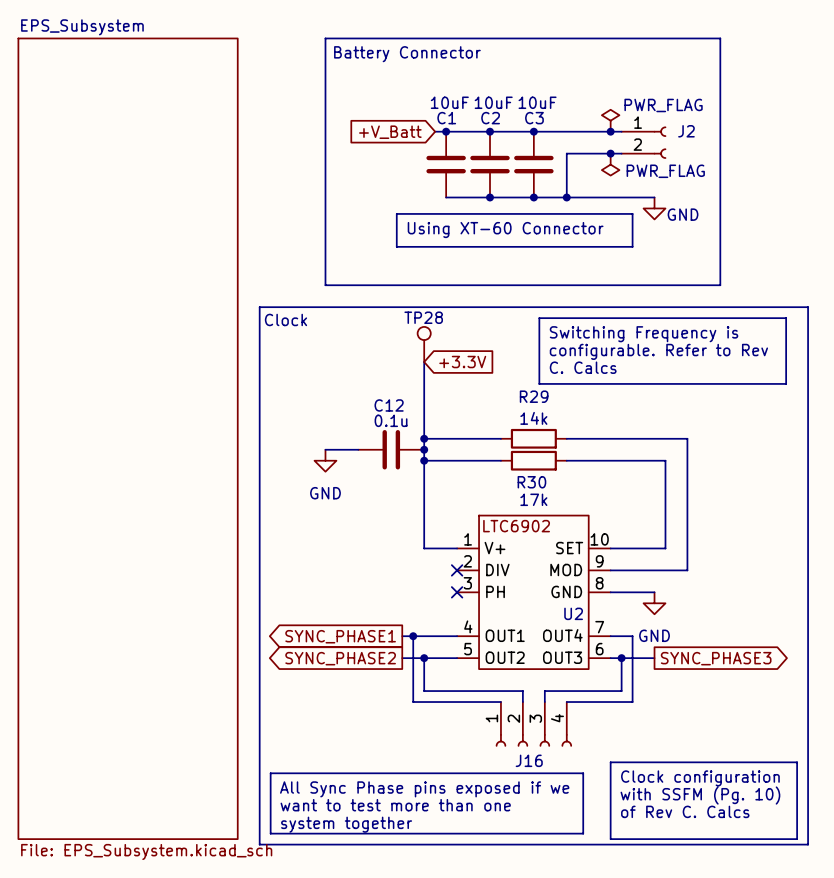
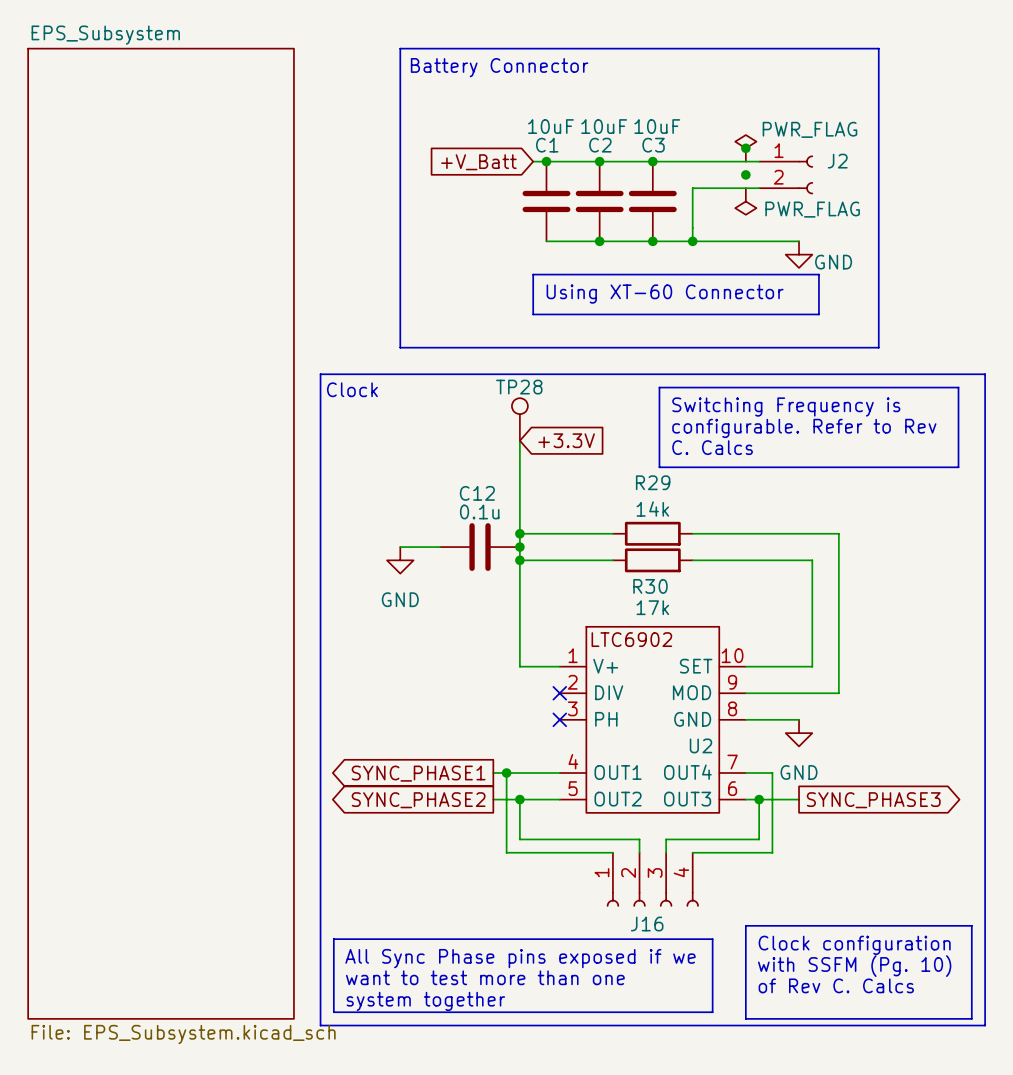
junction: none -> (745, 148)
junction: (610, 131) -> none
junction: none -> (745, 174)
junction: (610, 153) -> none
line: (396, 213) (632, 213) (632, 246) (396, 246) (396, 213) -> (533, 274) (818, 274) (818, 314) (533, 314) (533, 274)
text position: Using XT-60 Connector (505, 230) -> Using XT-60 Connector (665, 294)

